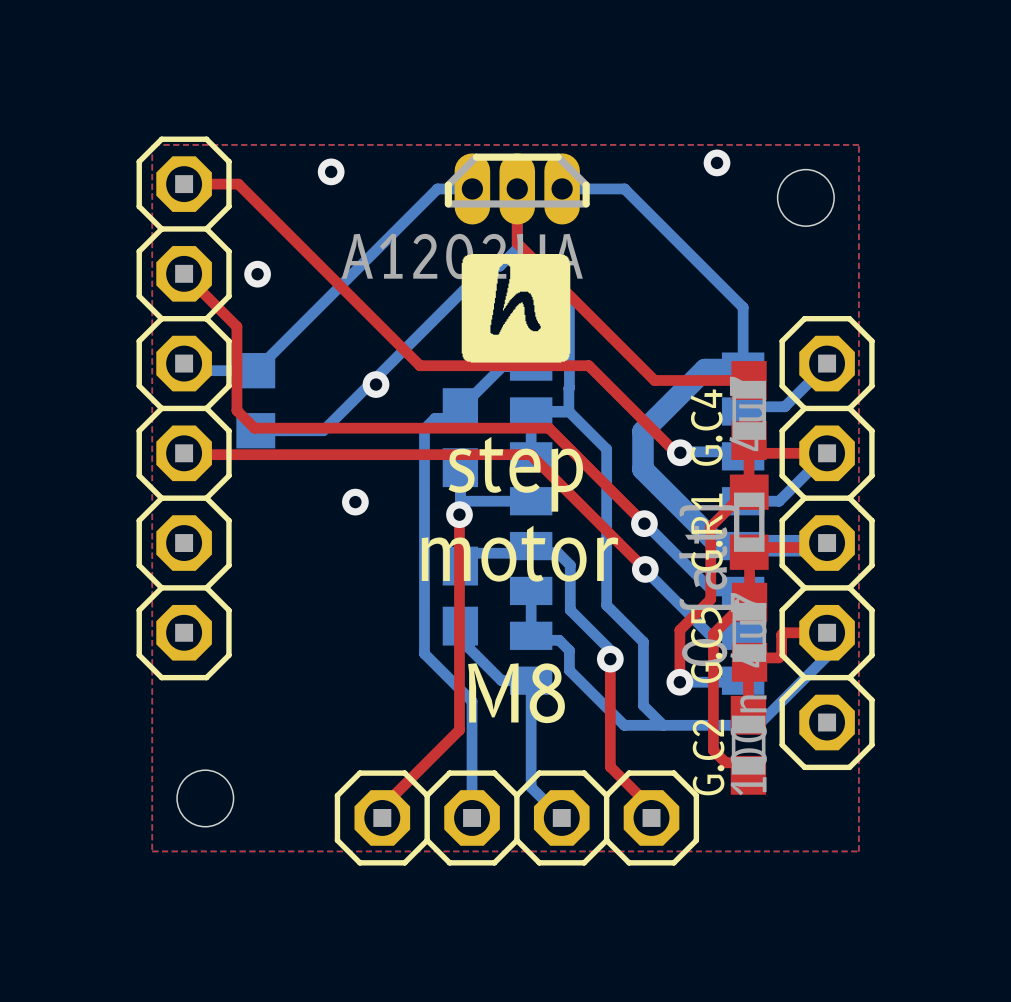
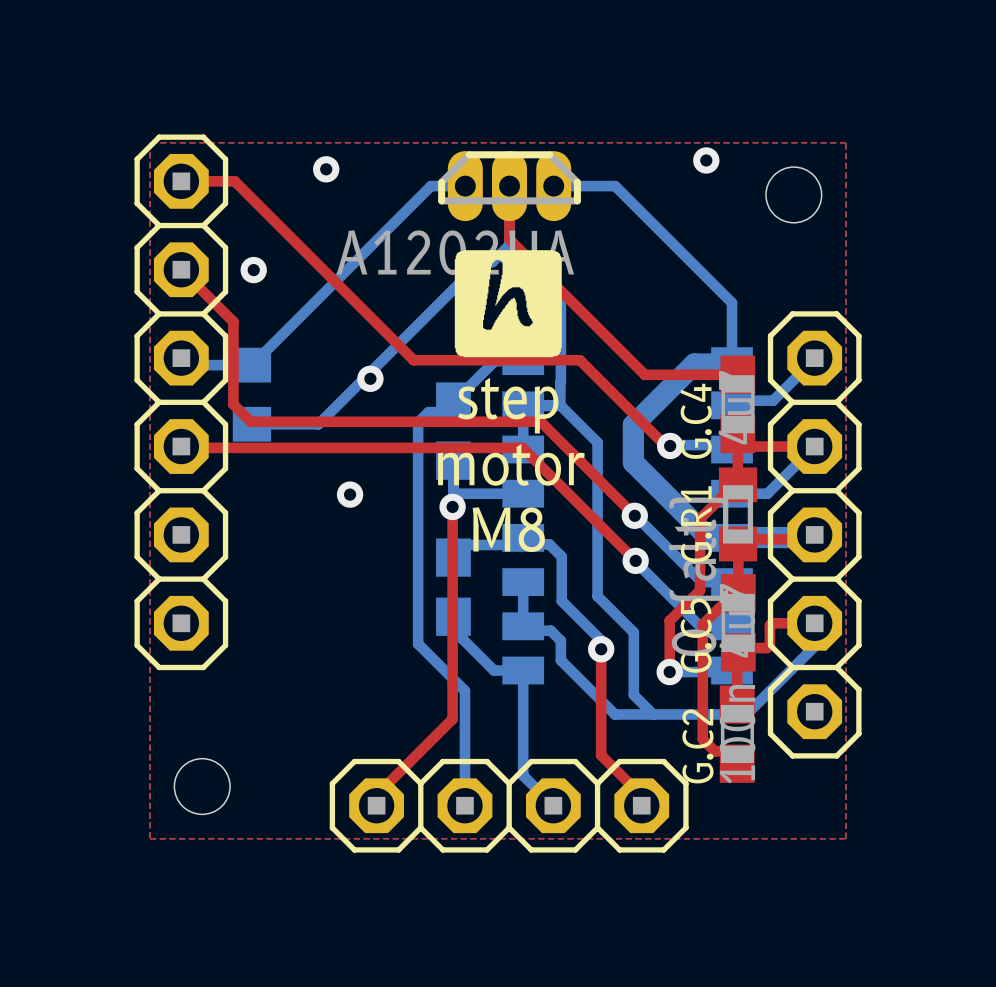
text: none -> step (508, 405)
text: step (515, 474) -> motor (511, 464)
text: motor (519, 553) -> M8 (508, 529)
text: M8 (516, 693) -> none

